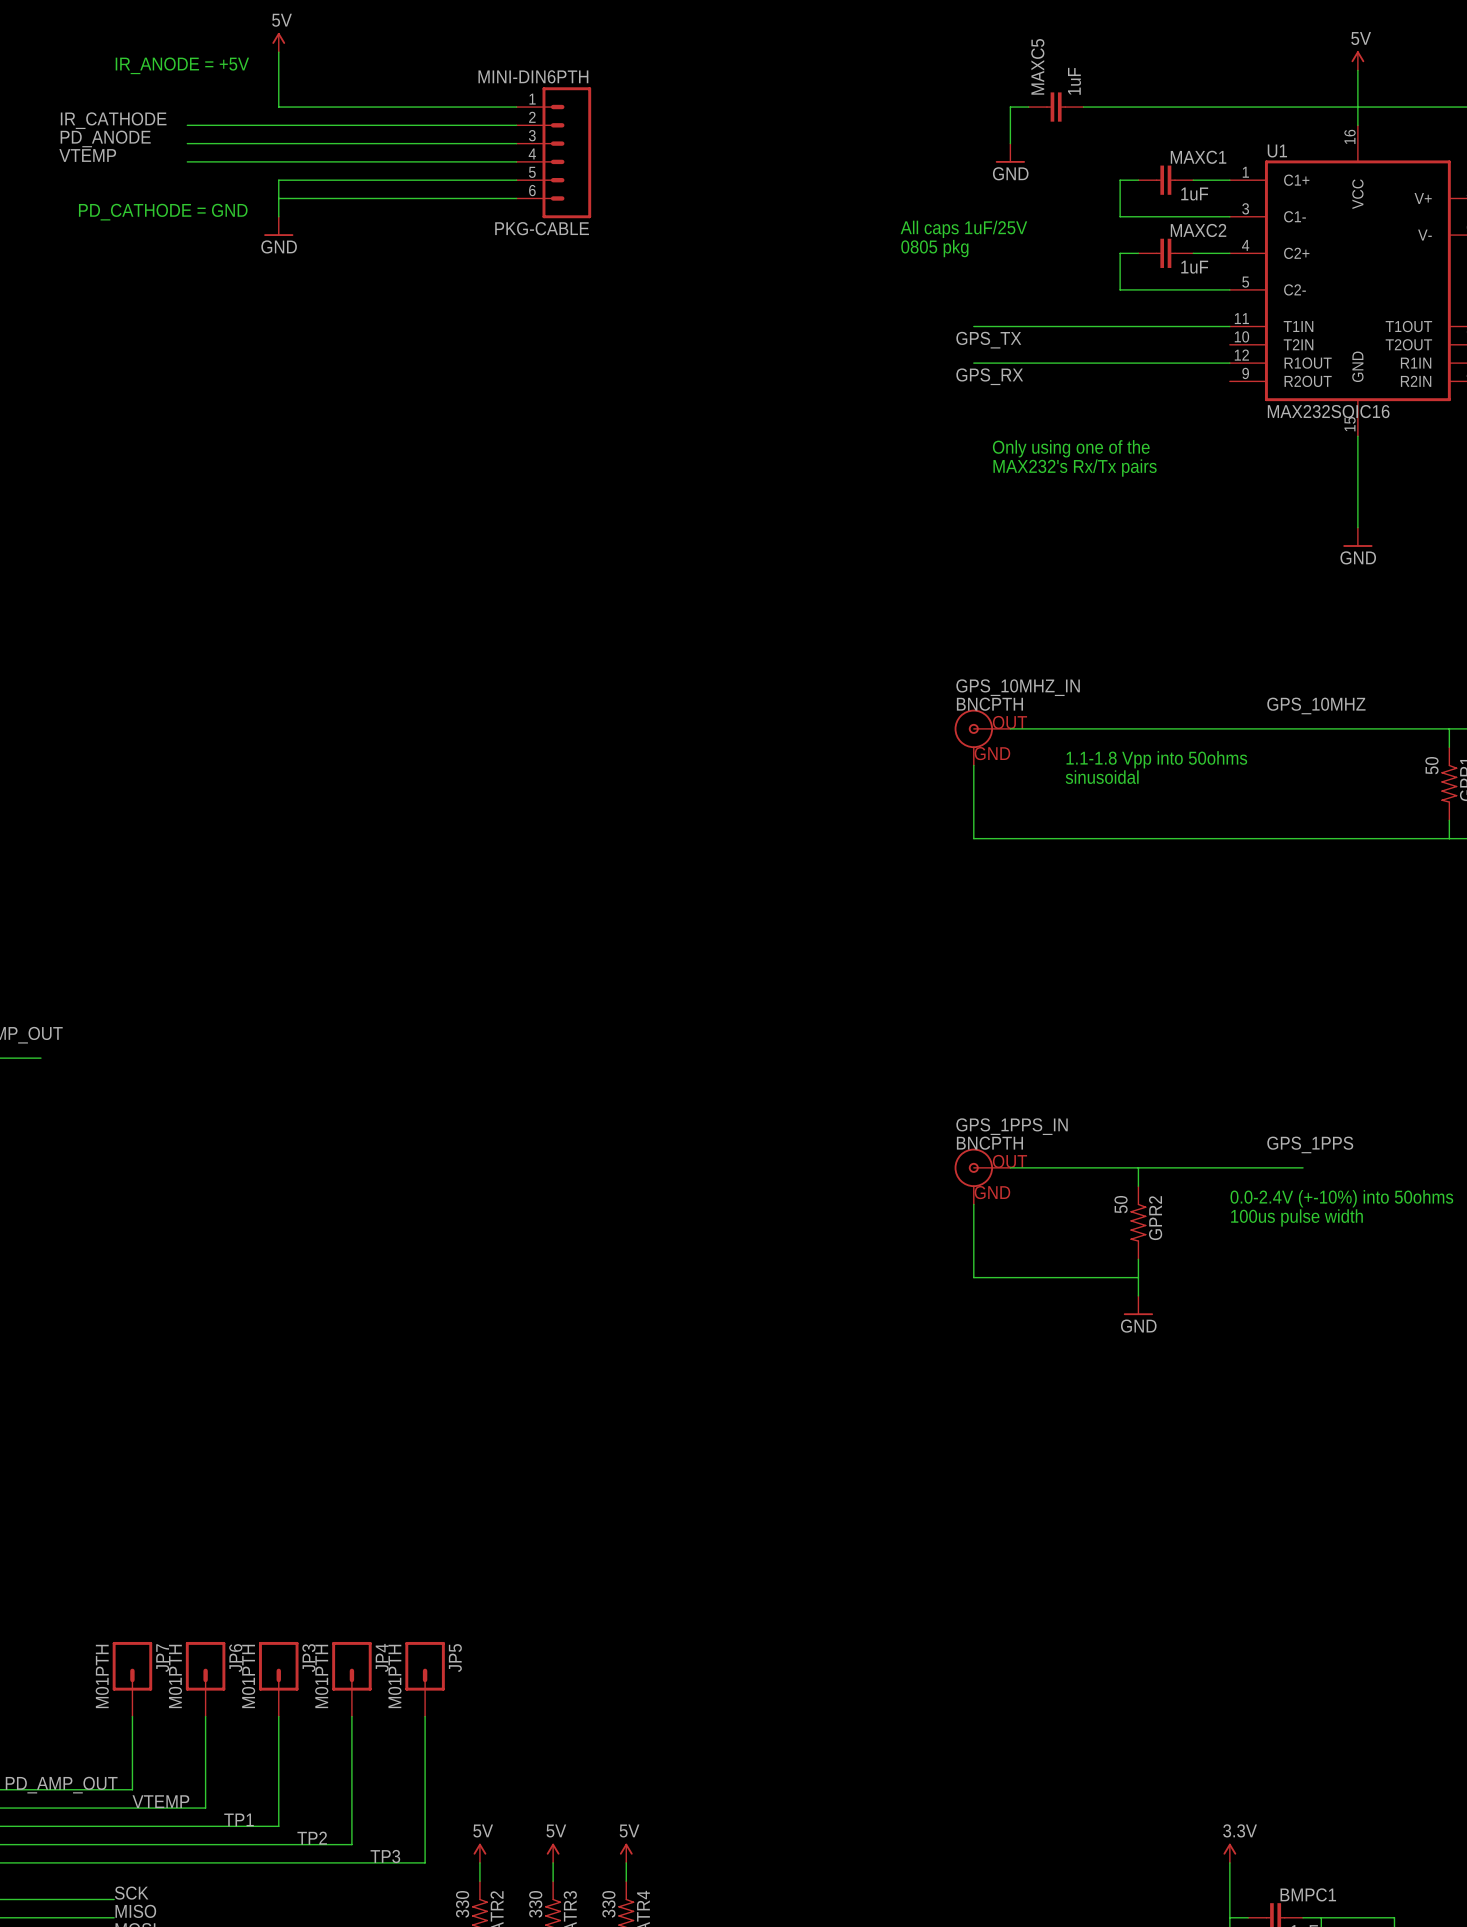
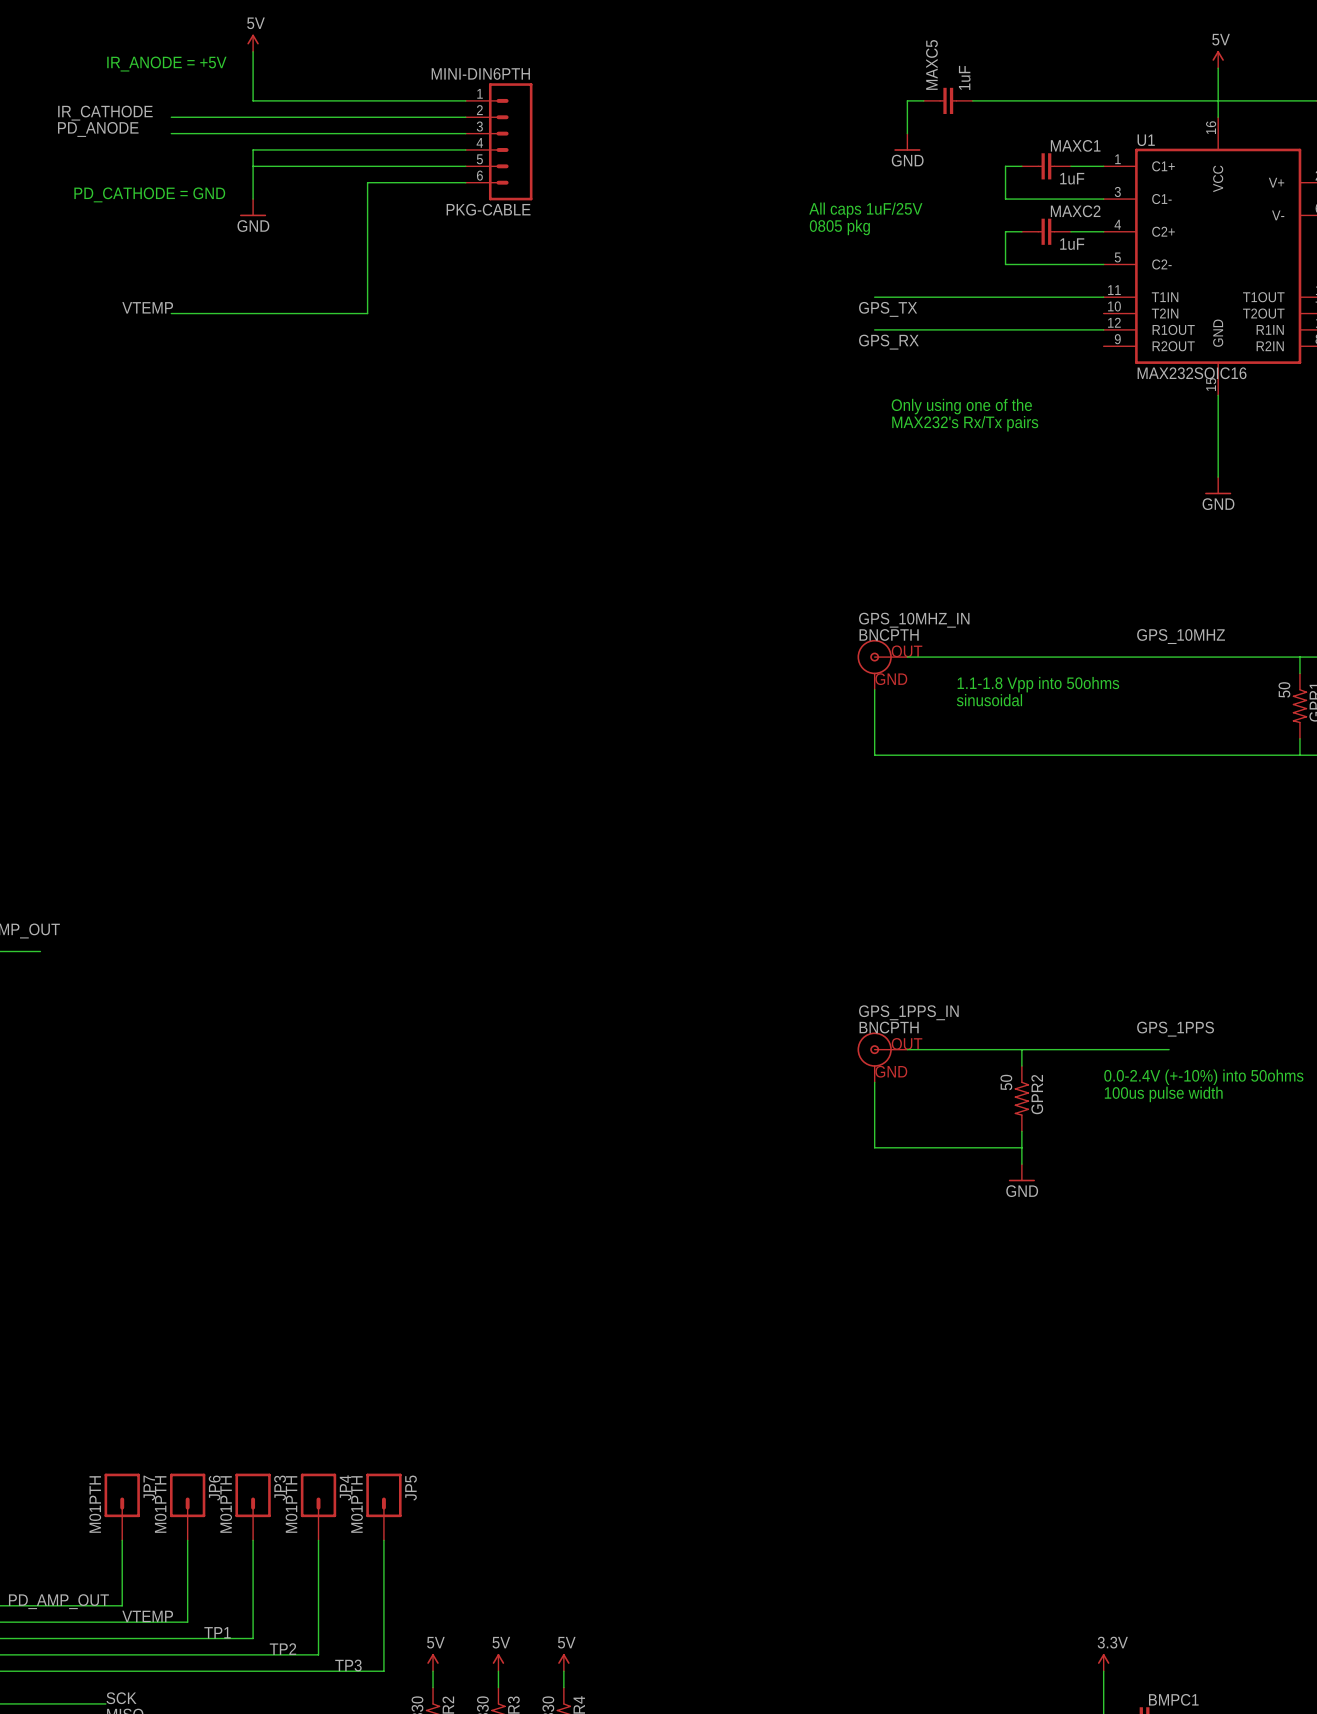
label: VTEMP (87, 155) -> none
wire: (187, 161) (278, 161) -> (253, 166) (253, 149)
wire: (278, 198) (406, 198) -> (171, 313) (367, 313) (367, 182)
label: none -> VTEMP (147, 307)

